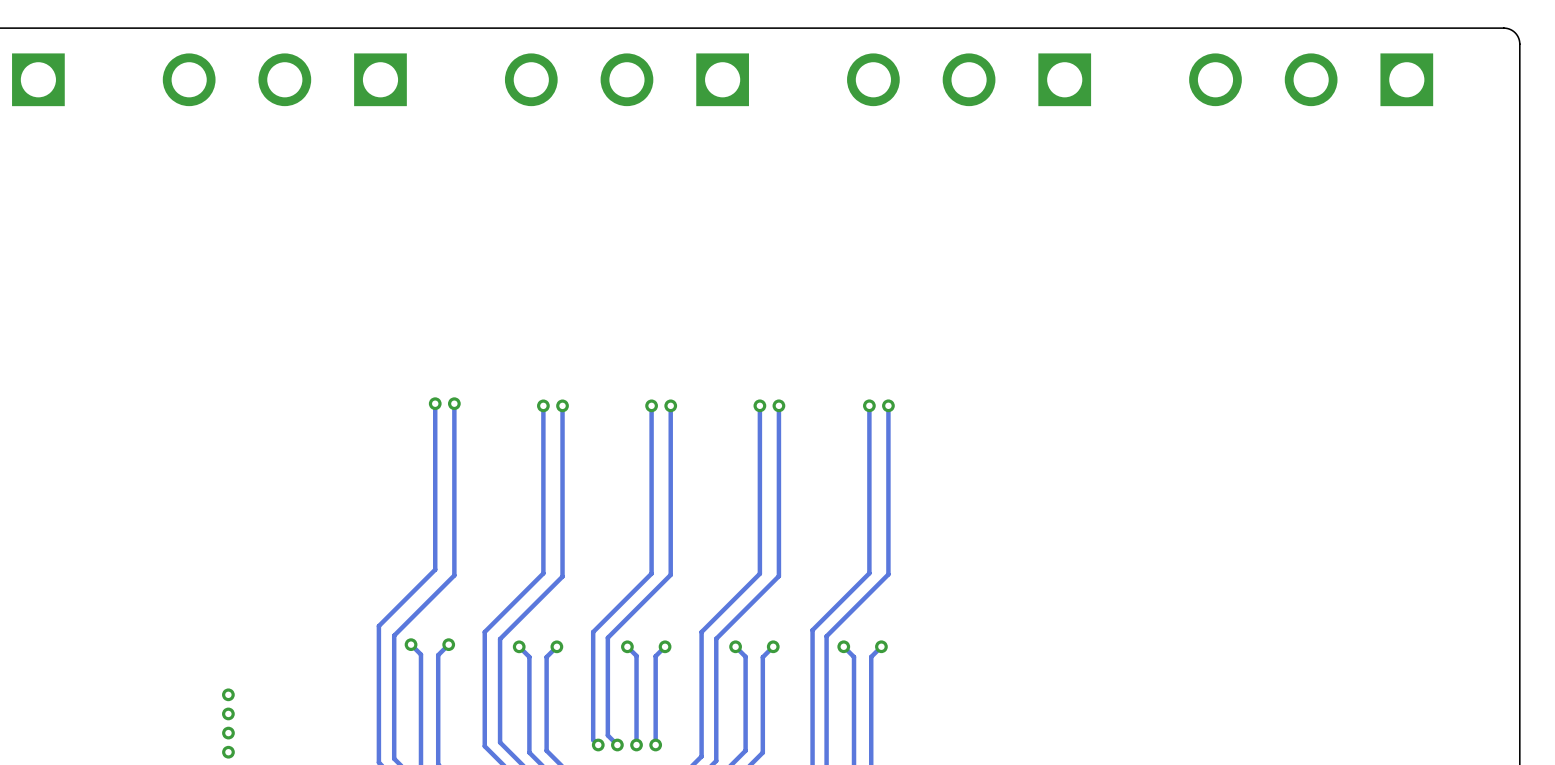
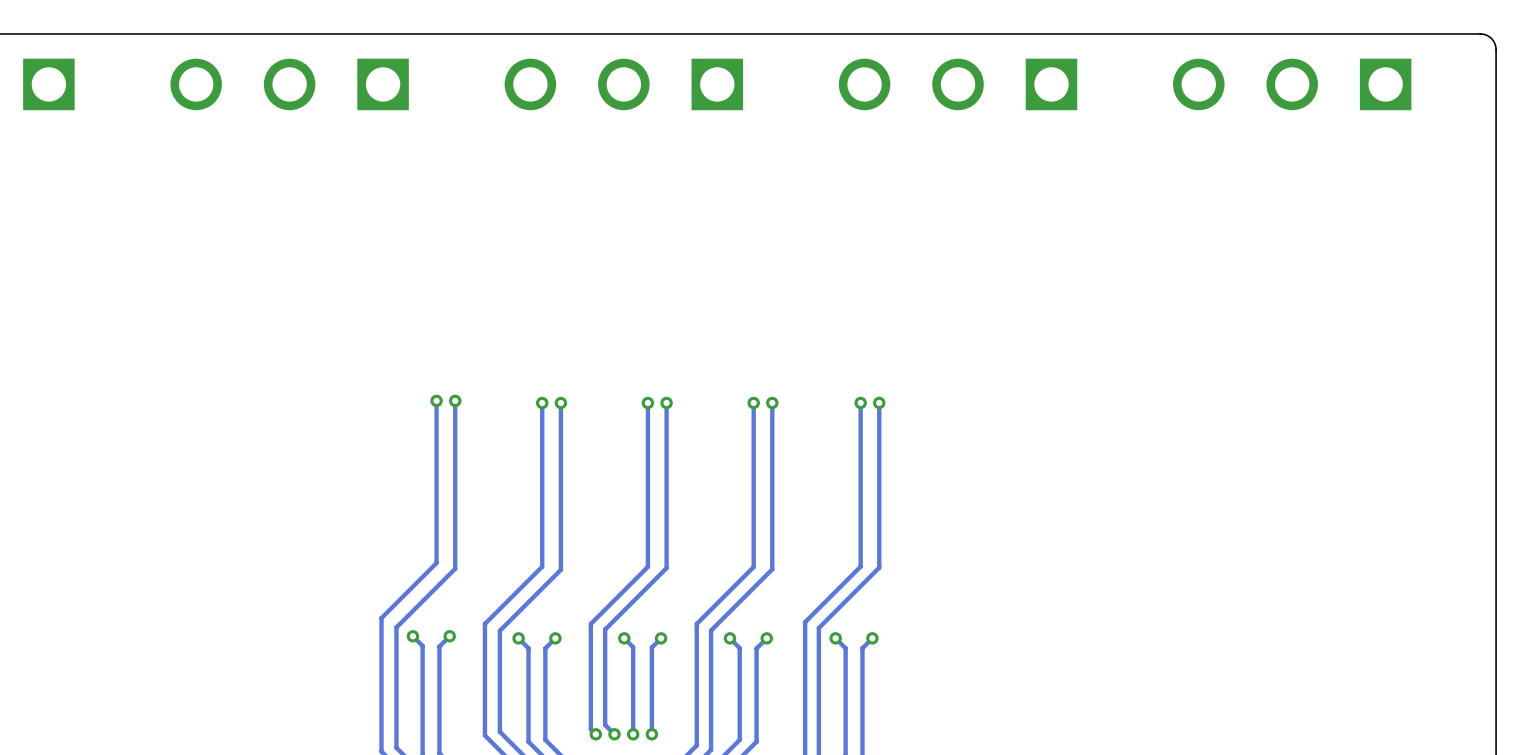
via: (228, 694) -> none
via: (228, 713) -> none
via: (228, 733) -> none
via: (228, 752) -> none

